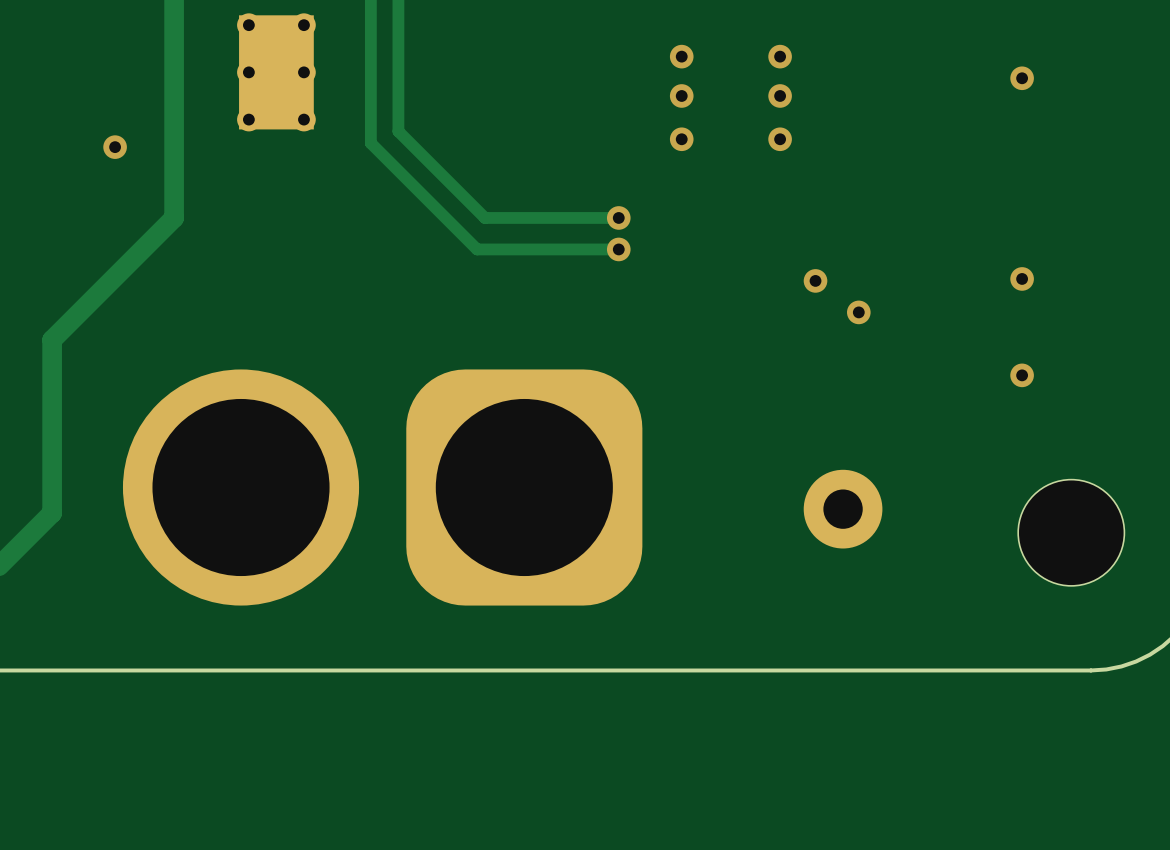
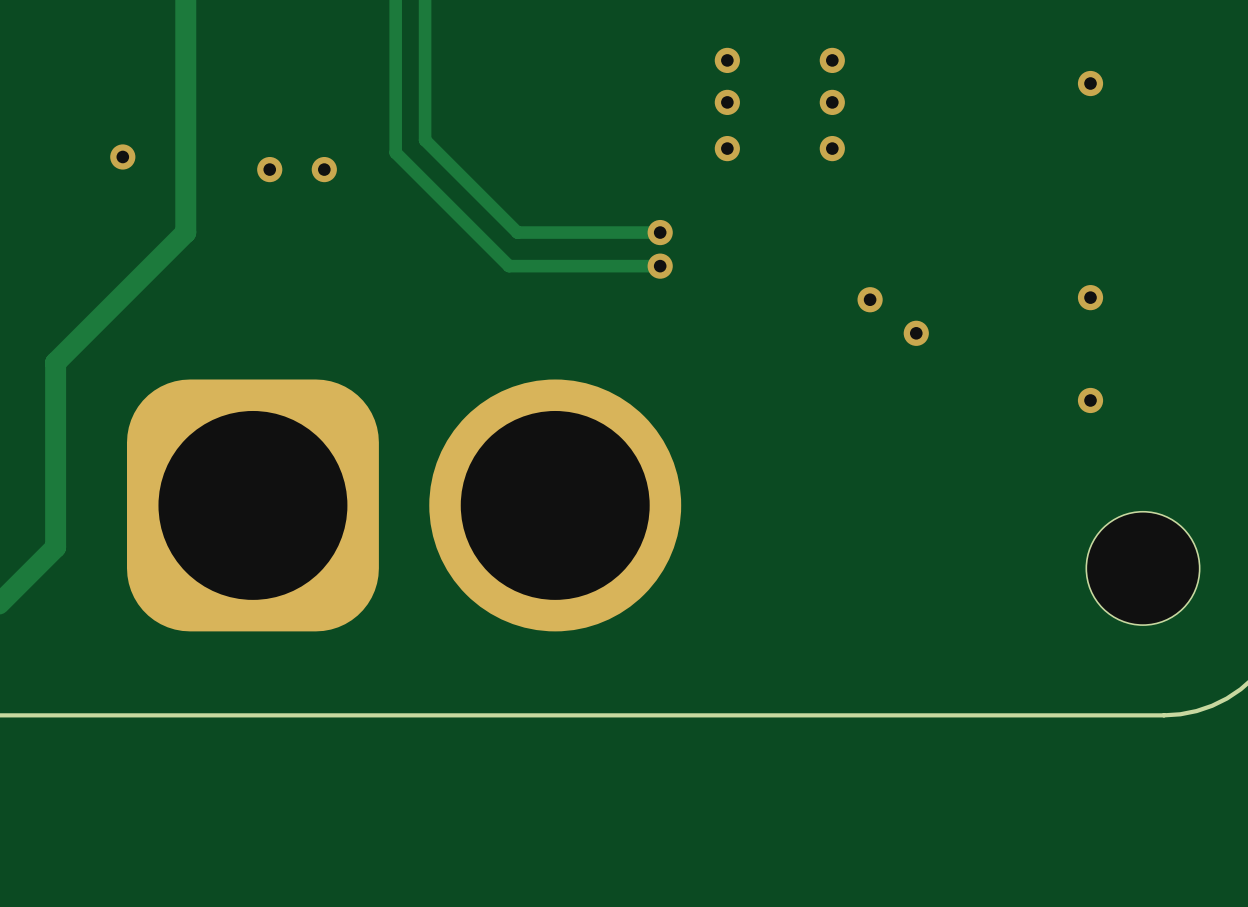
part: (276, 72) -> none
via: none -> (269, 169)
via: none -> (324, 169)
part rotation: 0° (382, 487) -> 180° (404, 505)
part: (843, 509) -> none

